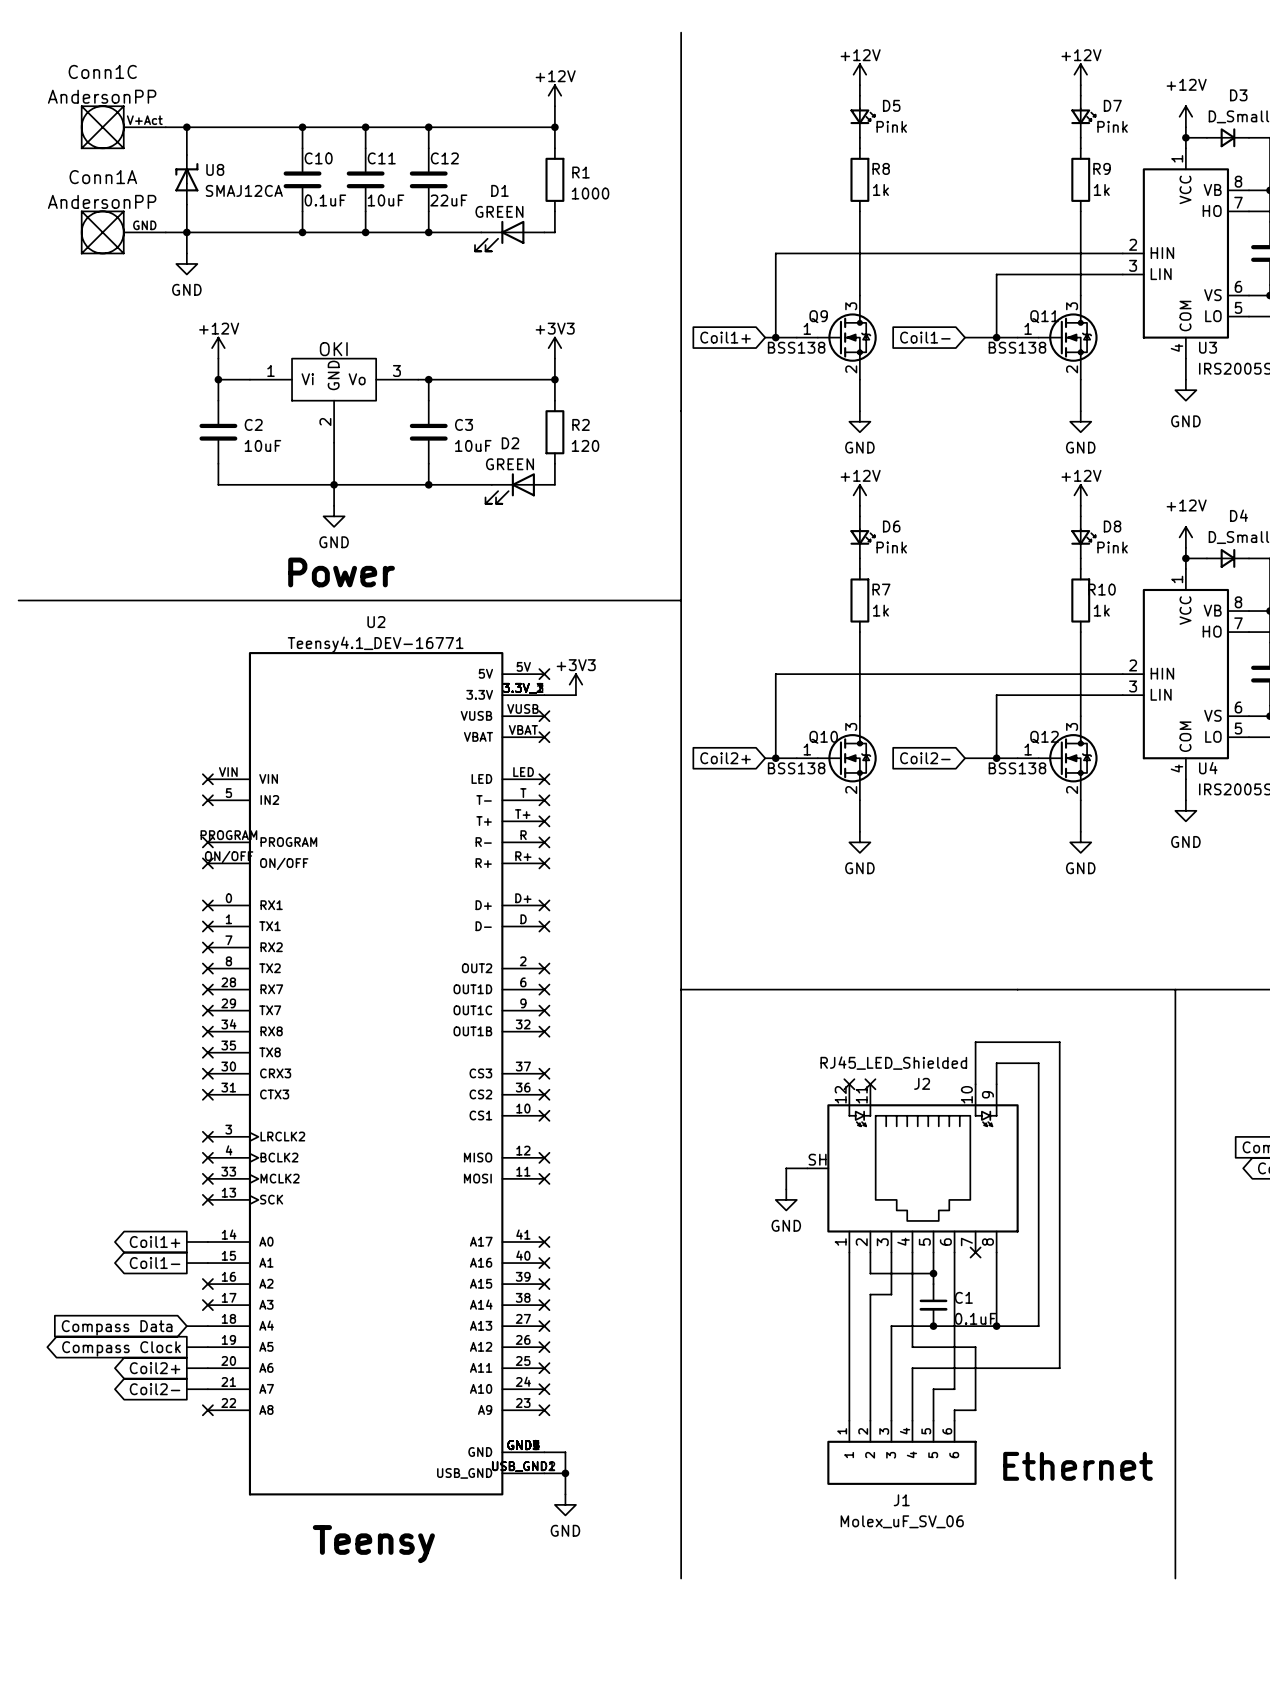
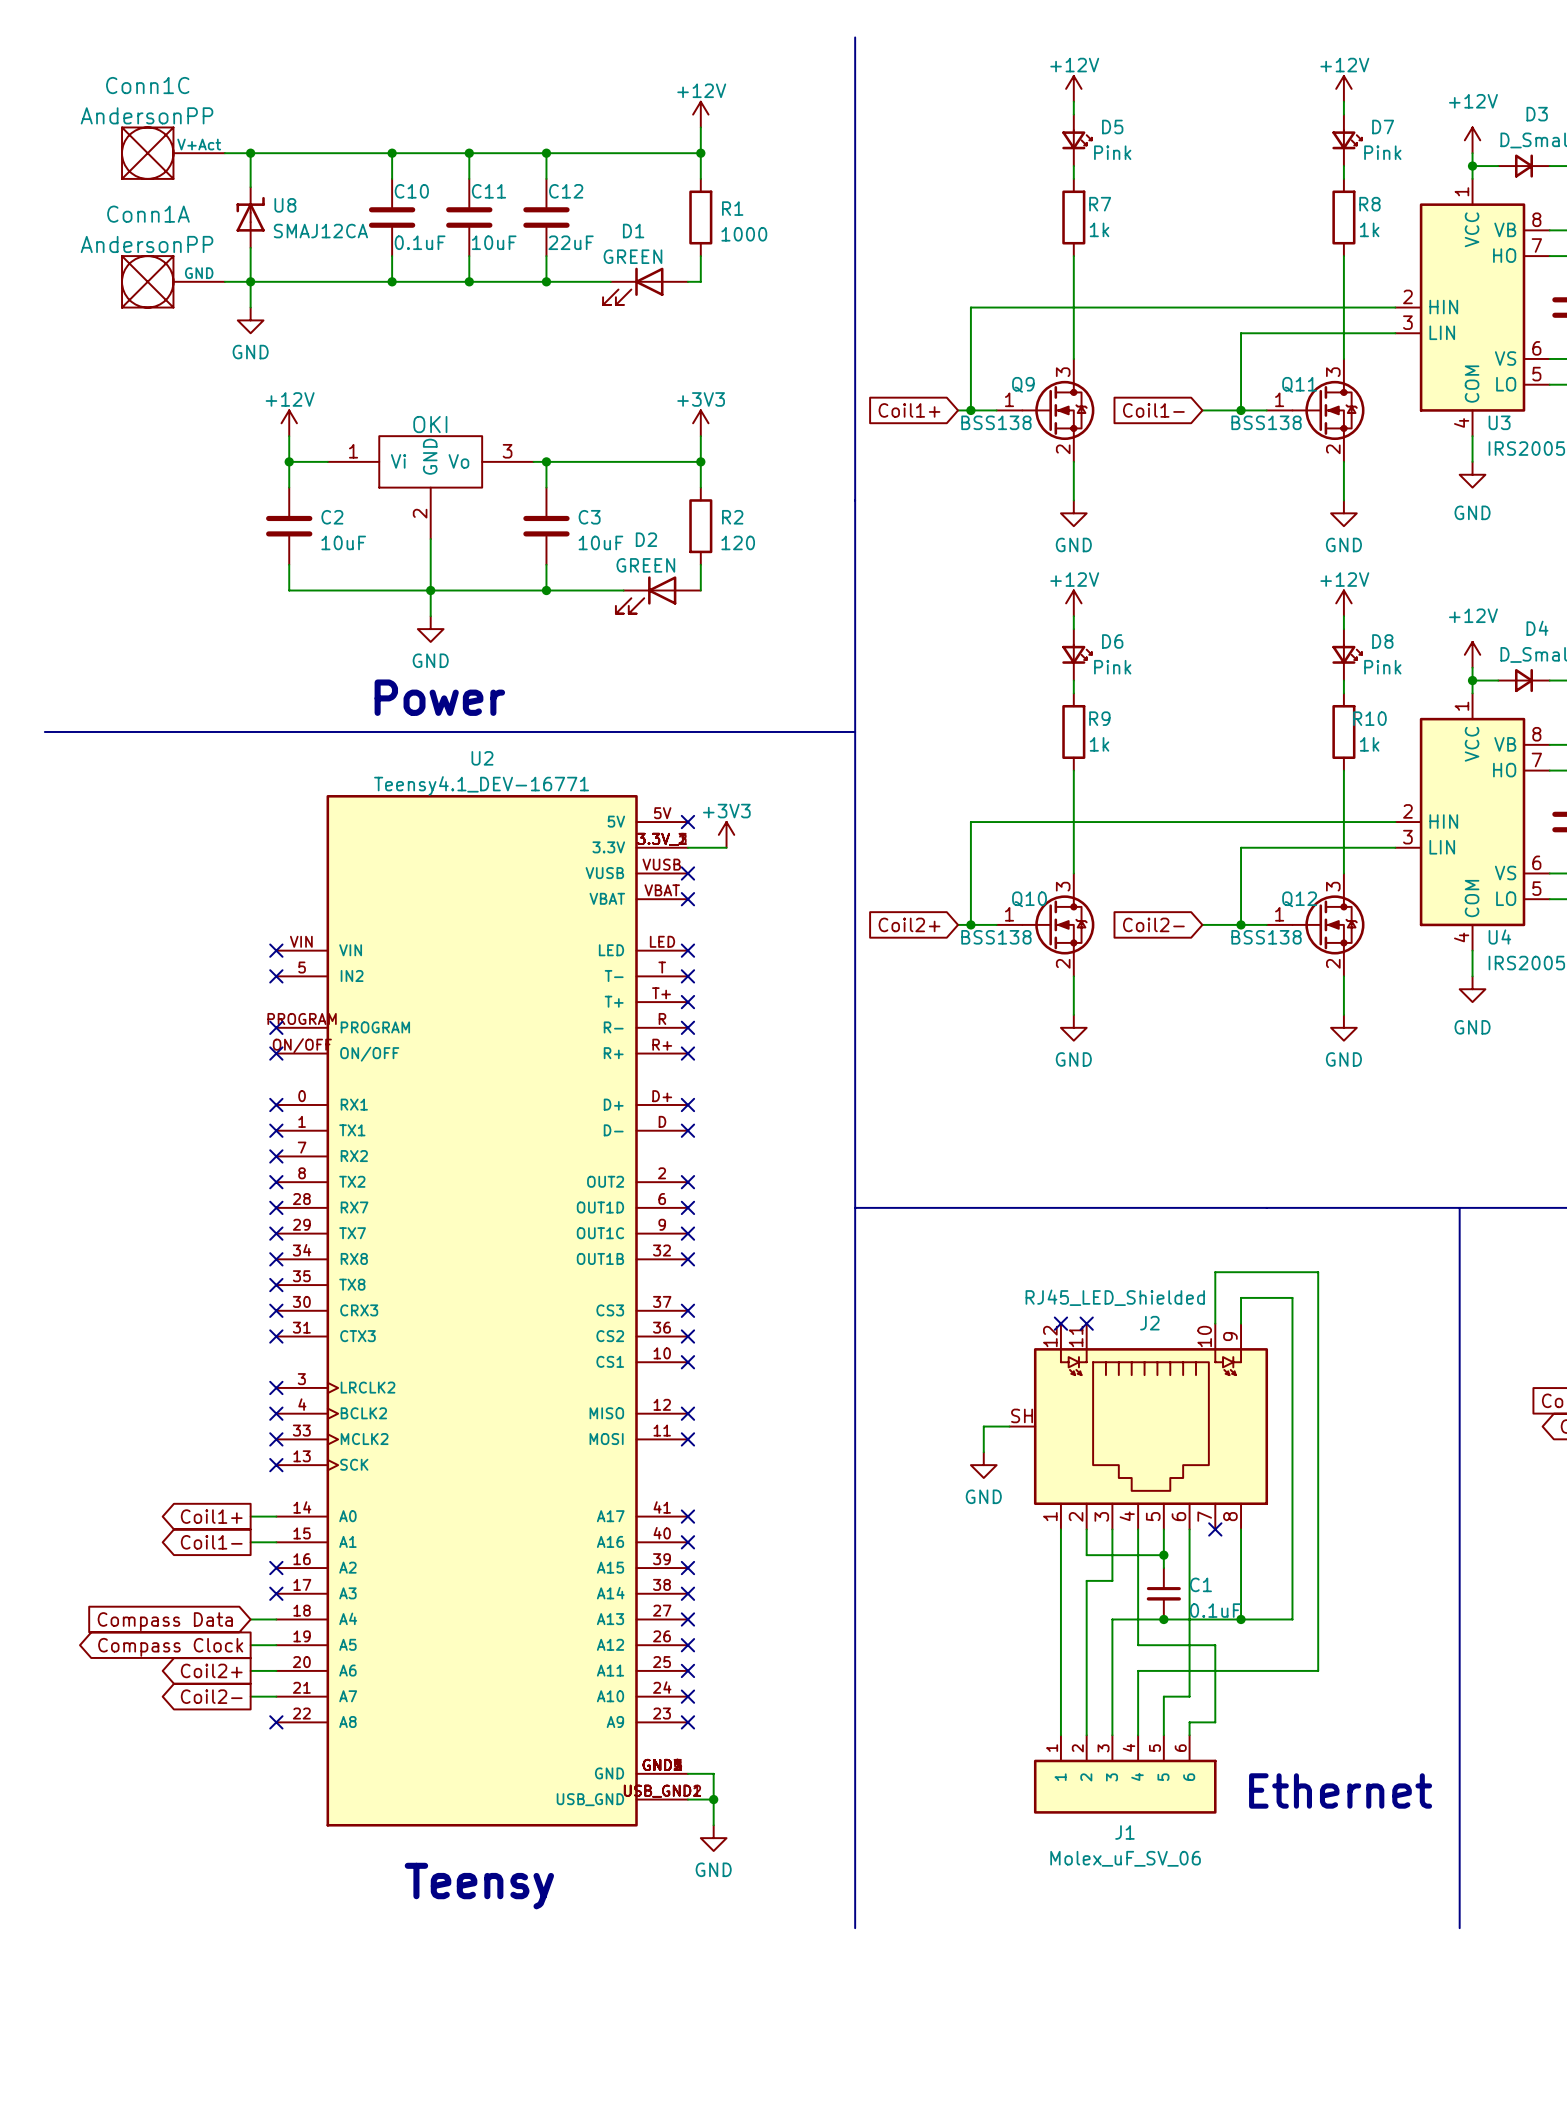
R8 name: R8 (881, 168) -> R7 (1100, 204)
R9 name: R9 (1102, 168) -> R8 (1369, 204)
R7 name: R7 (881, 589) -> R9 (1099, 718)

